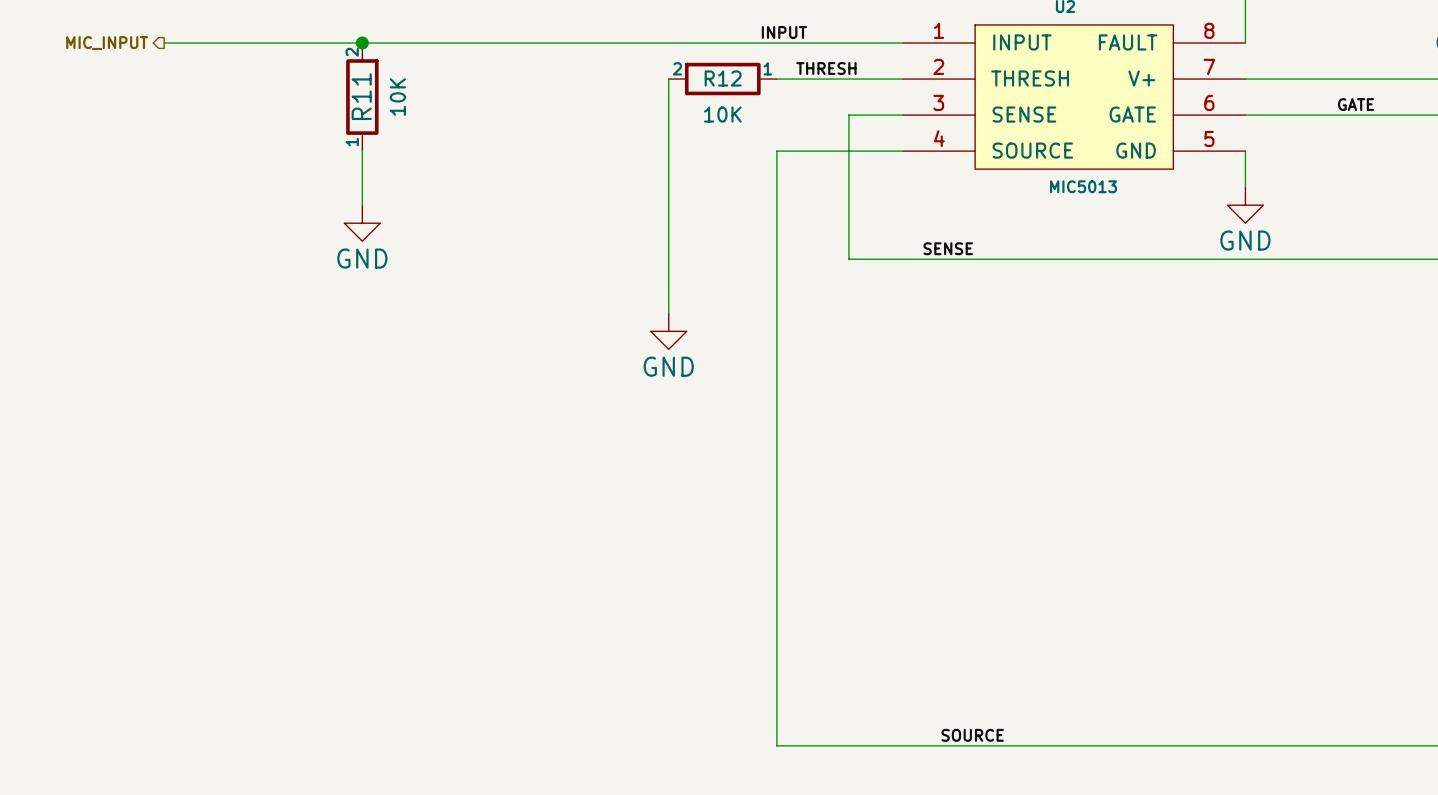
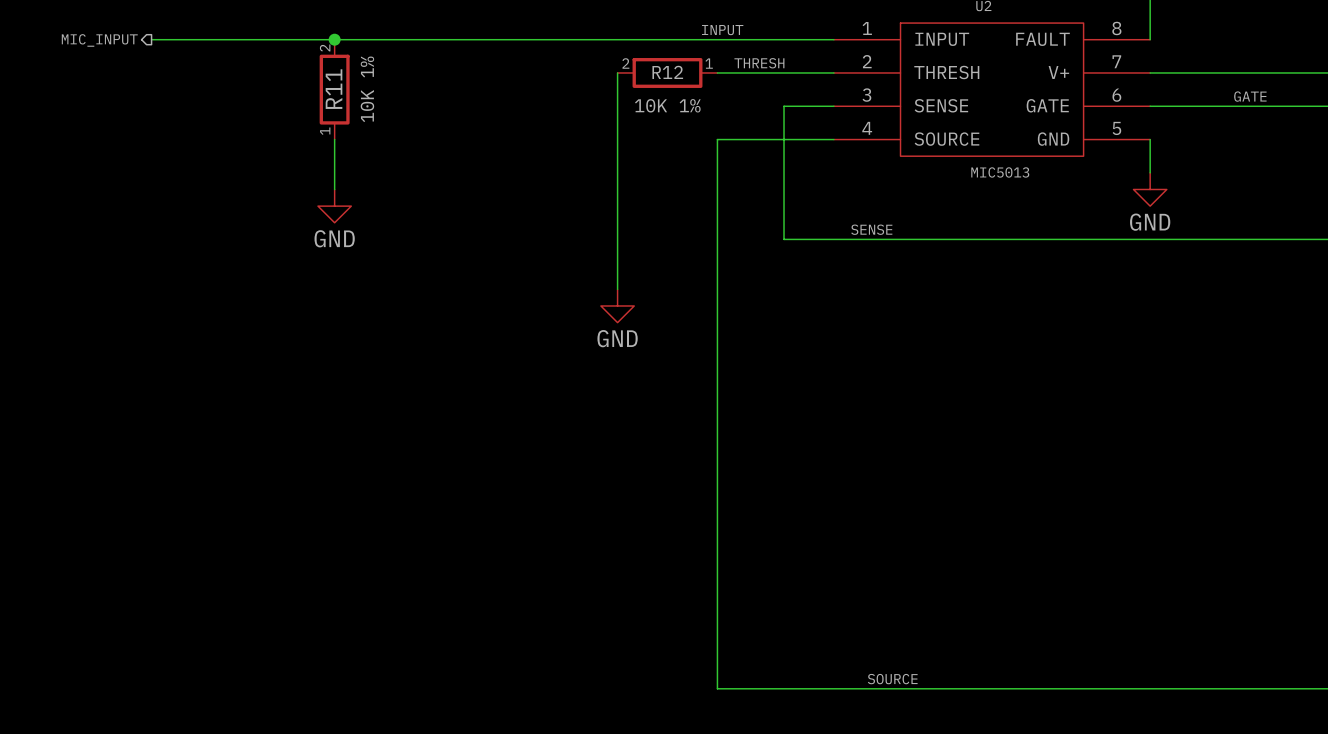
R11 value: 10K (397, 97) -> 10K 1% (367, 89)
R12 value: 10K (722, 114) -> 10K 1% (667, 105)

